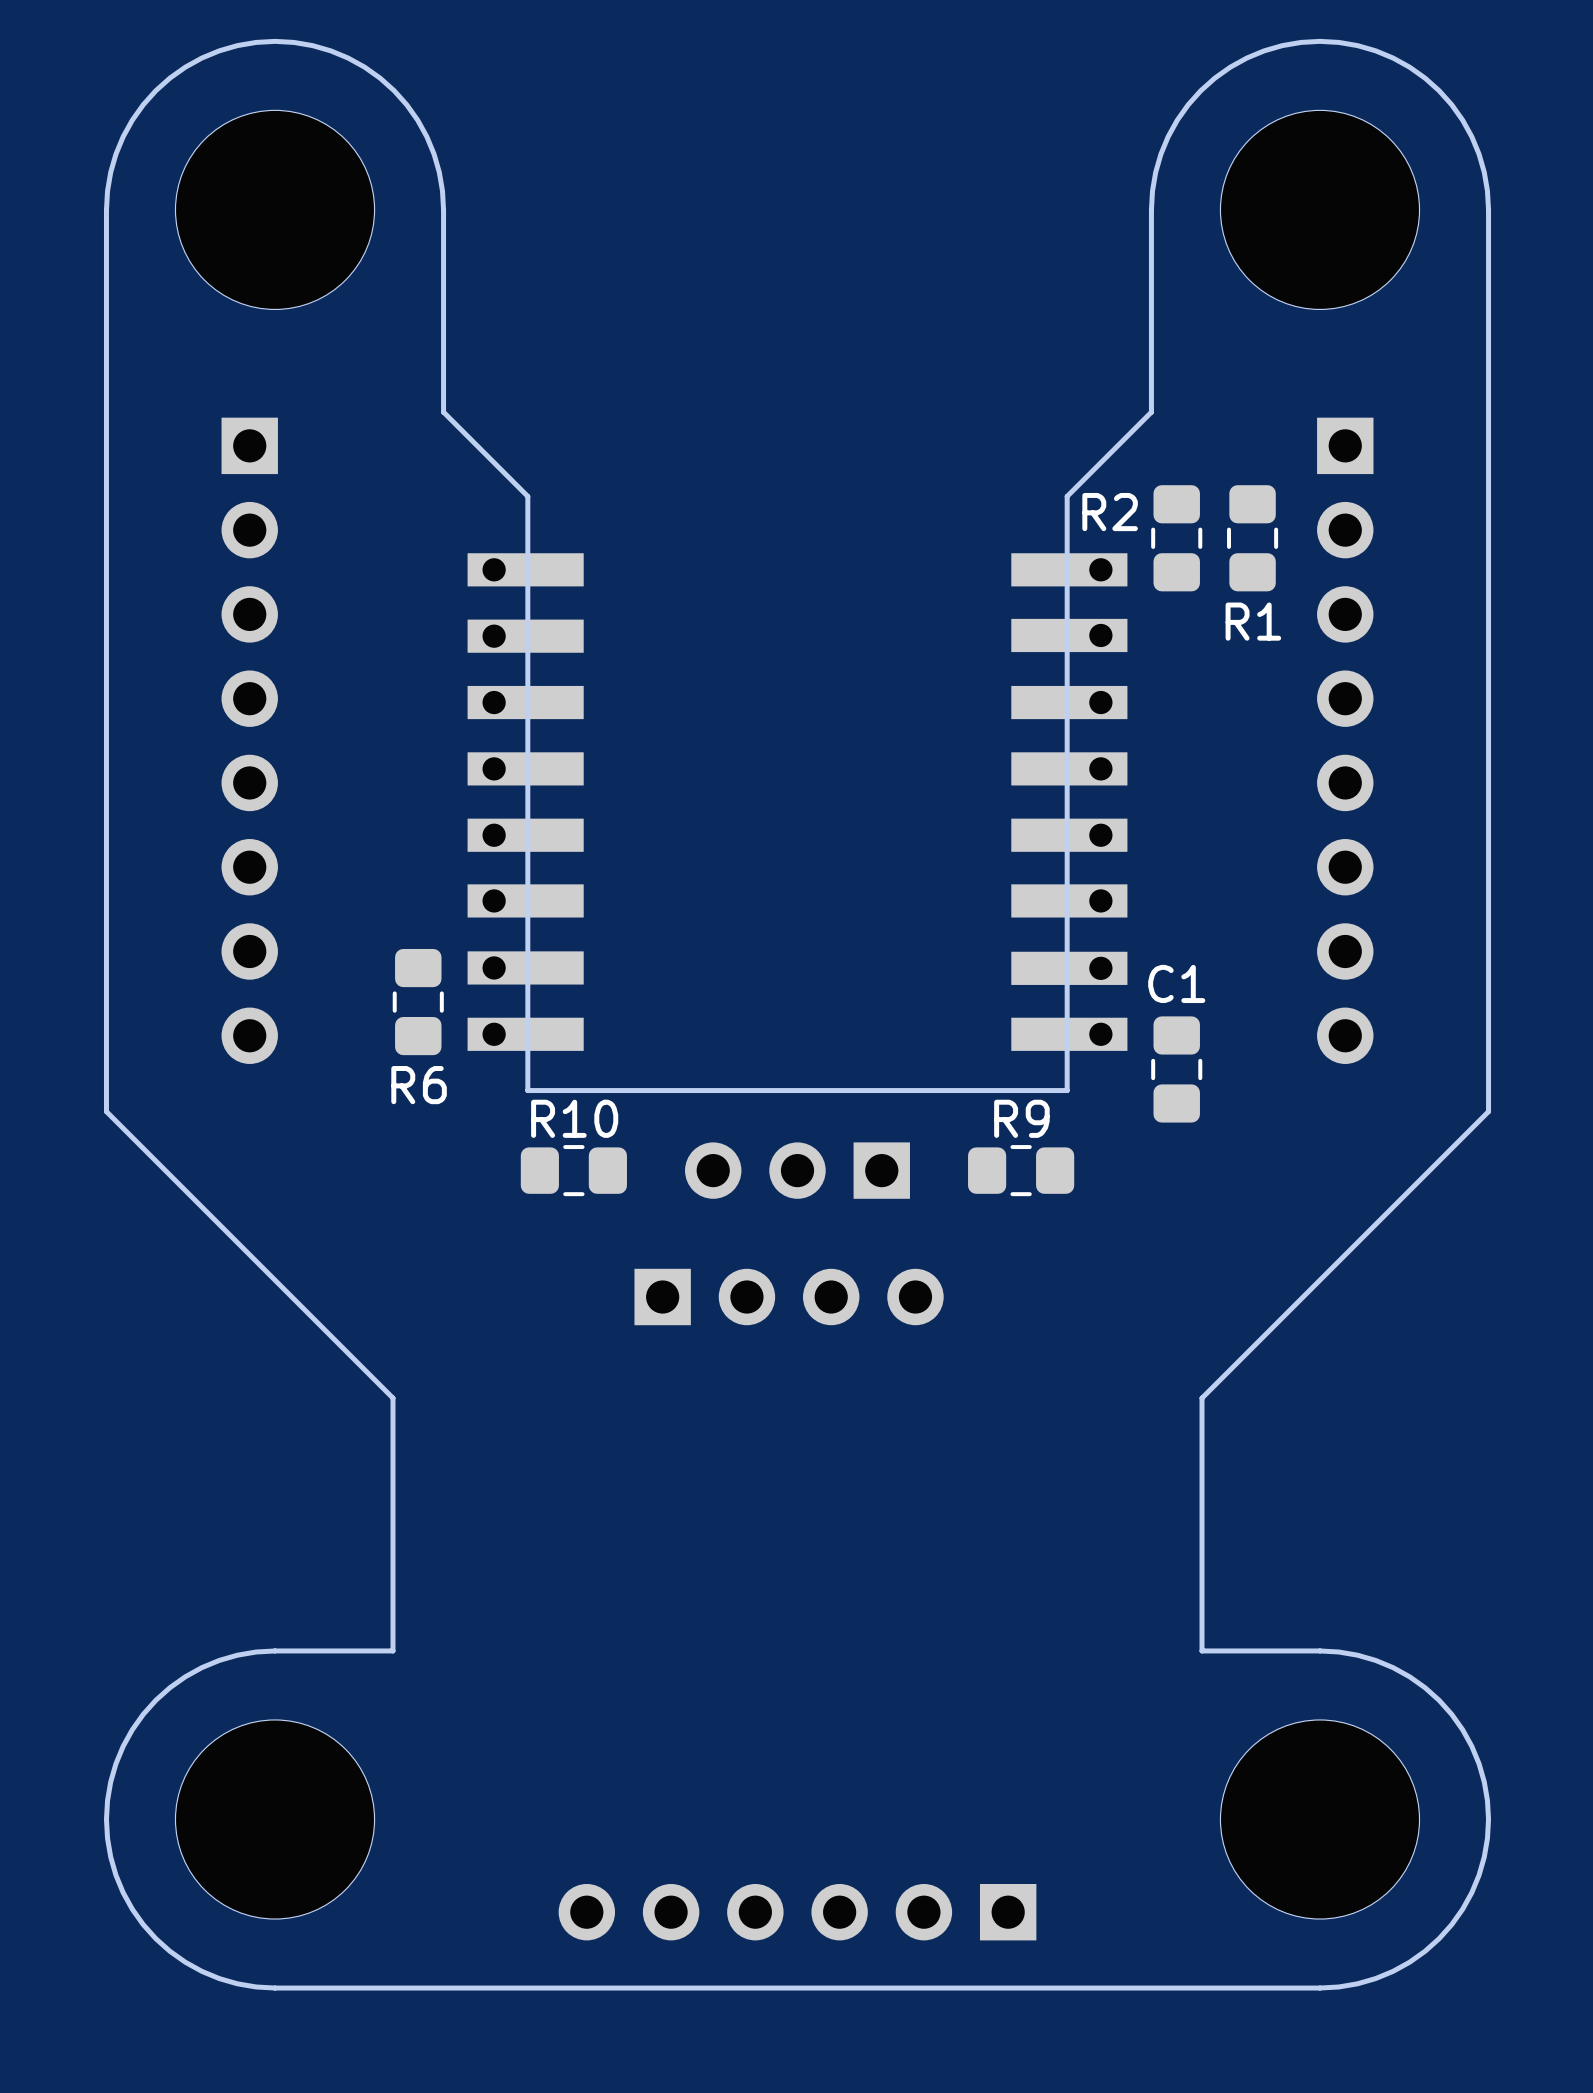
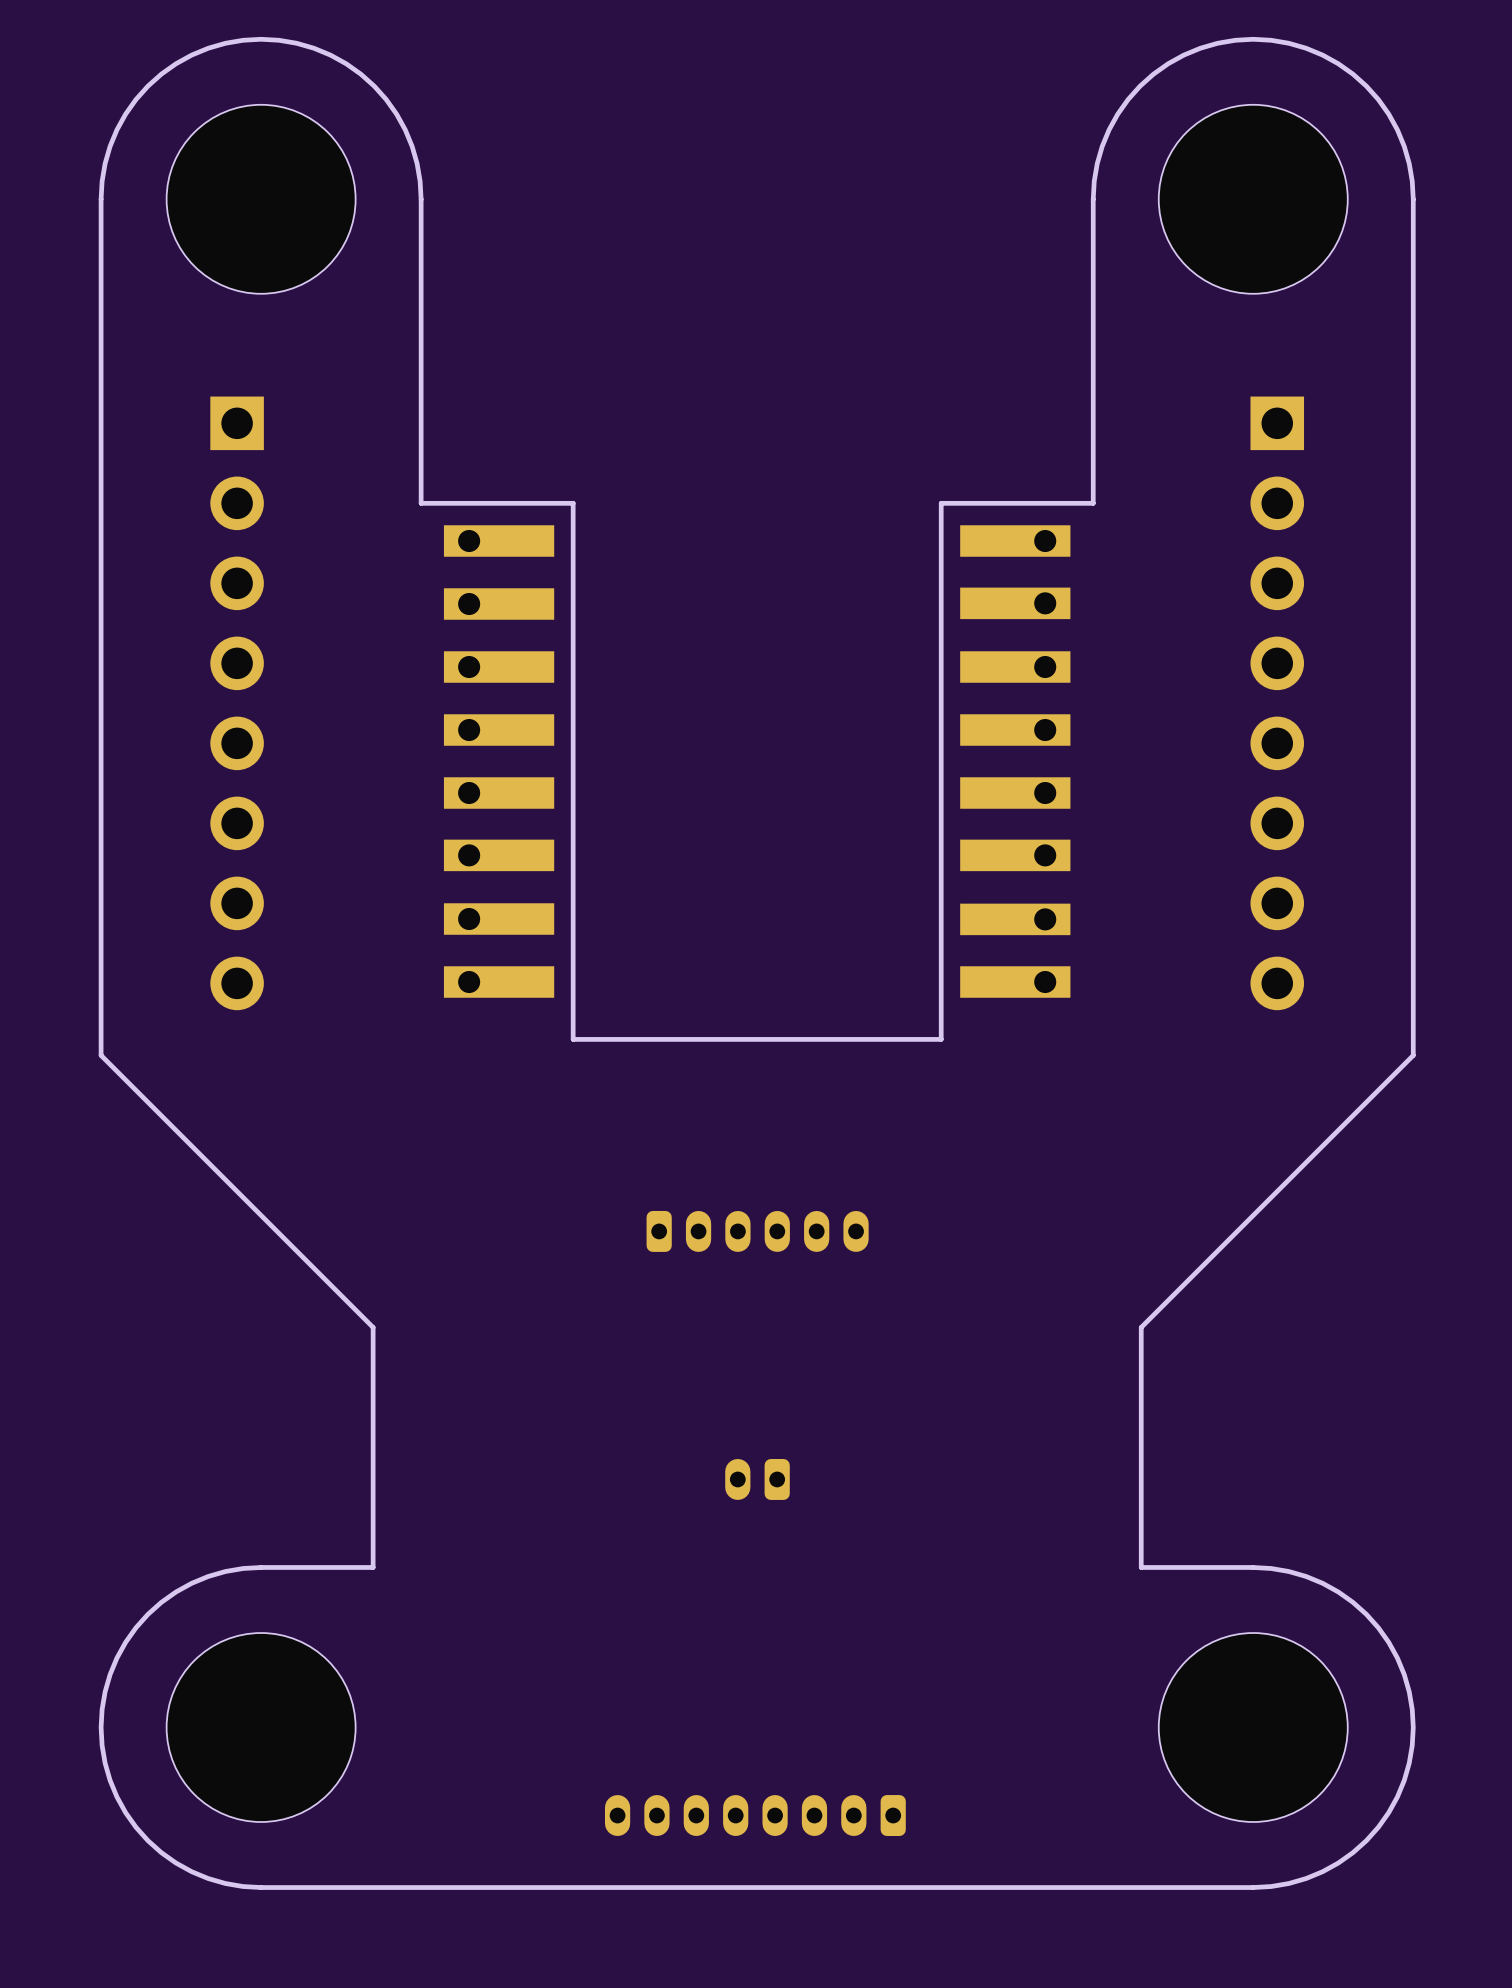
board edge: (1151, 412) (1067, 496) (1067, 1090) (527, 1090) (527, 496) (443, 412) -> (1093, 391) (1093, 503) (941, 503) (941, 1039) (573, 1039) (573, 503) (421, 503) (421, 391)
R2: (1176, 538) -> none
R1: (1252, 538) -> none
R6: (418, 1002) -> none
C1: (1176, 1069) -> none
R10: (573, 1170) -> none
part: (797, 1170) -> none
R9: (1021, 1170) -> none
part footprint: [634, 1268, 944, 1326] -> [646, 1210, 869, 1252]
part: none -> (757, 1479)
part footprint: [558, 1883, 1037, 1941] -> [604, 1795, 906, 1836]

